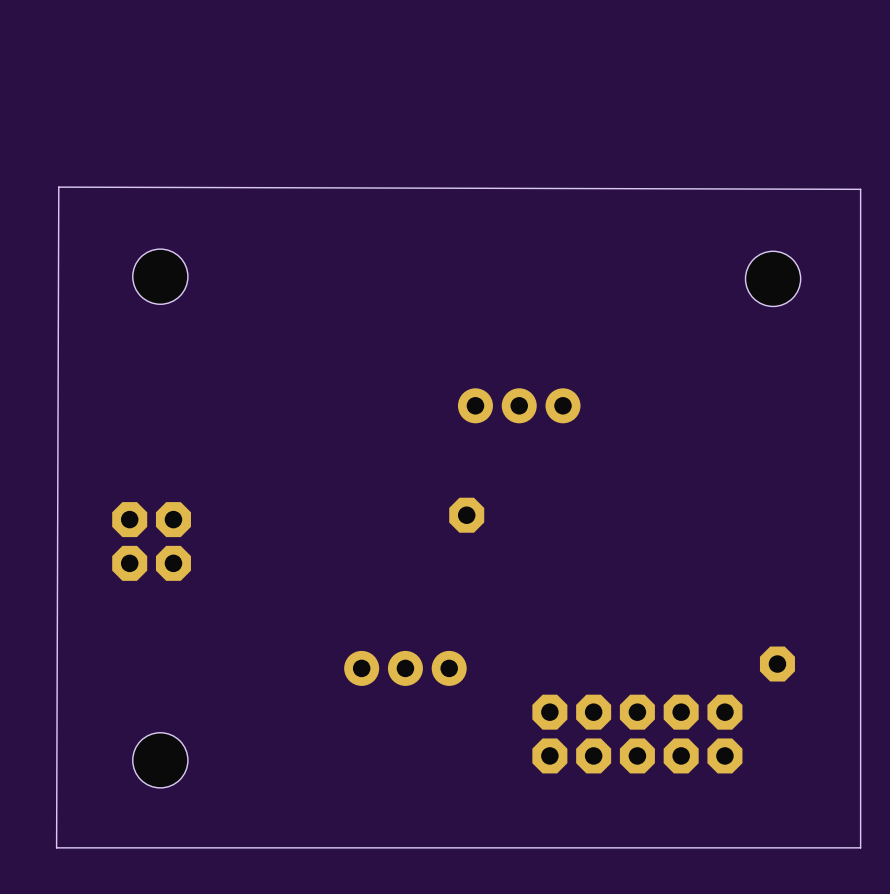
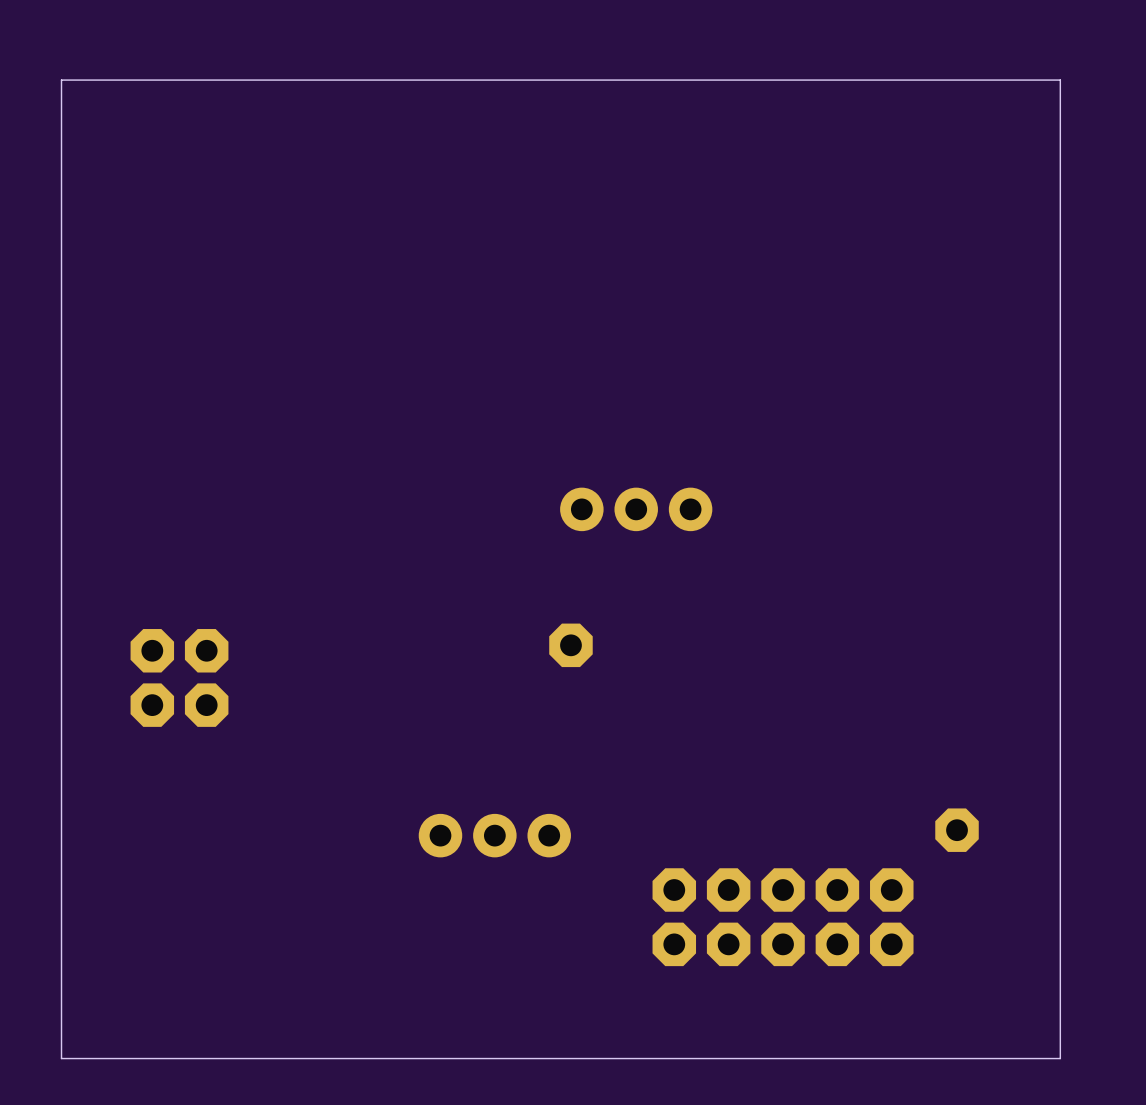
board edge: (860, 189) (58, 187) (56, 847) -> (1060, 240) (1060, 80) (61, 80) (61, 1058)
part: (160, 276) -> none
part: (773, 278) -> none
part: (160, 760) -> none

